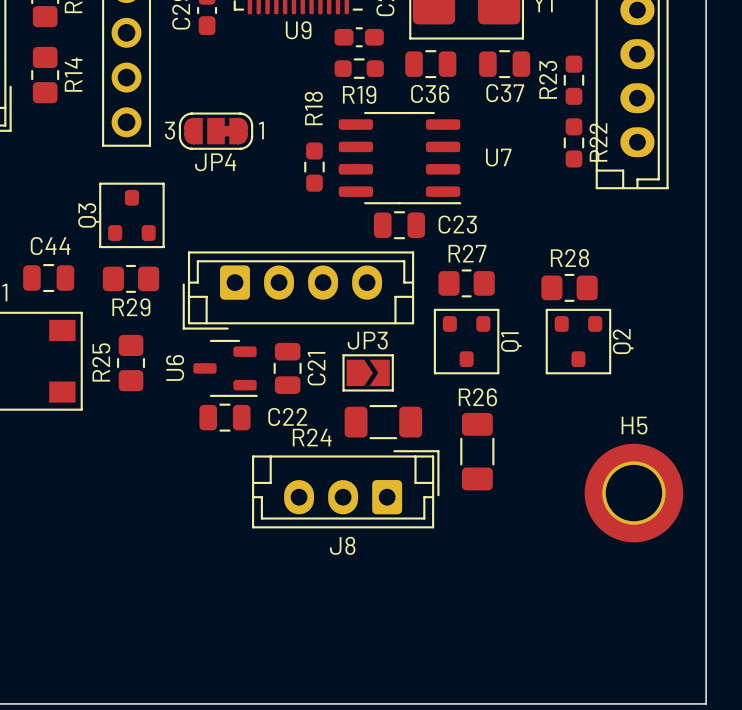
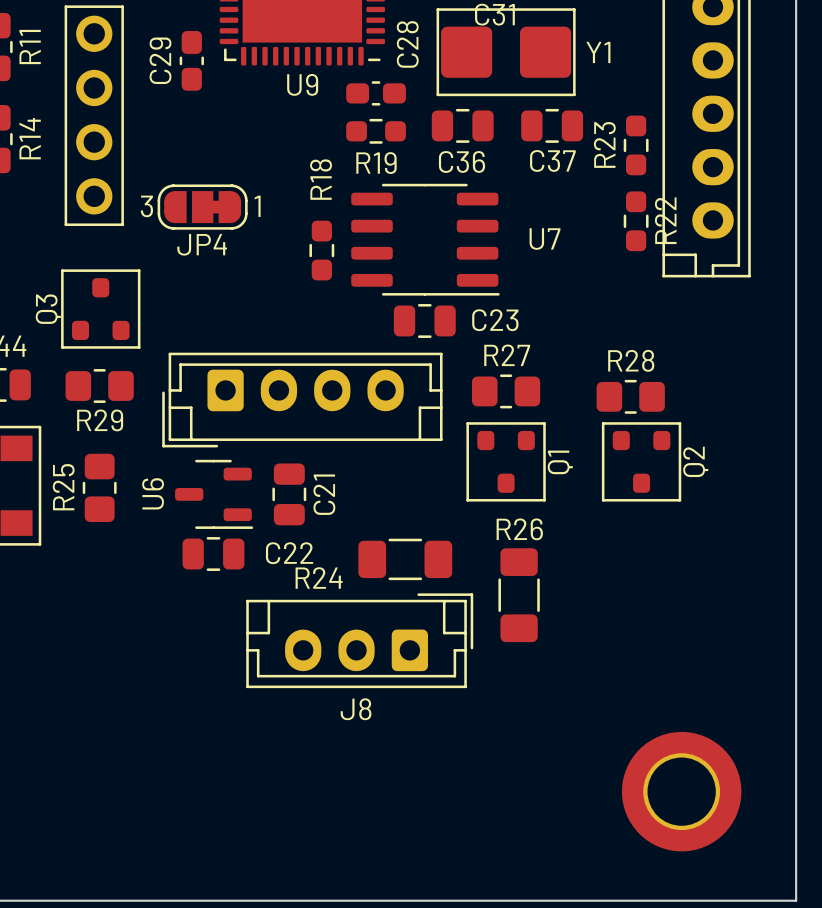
JP3: (368, 372) -> none
H5: (633, 493) -> none
part: none -> (681, 791)

